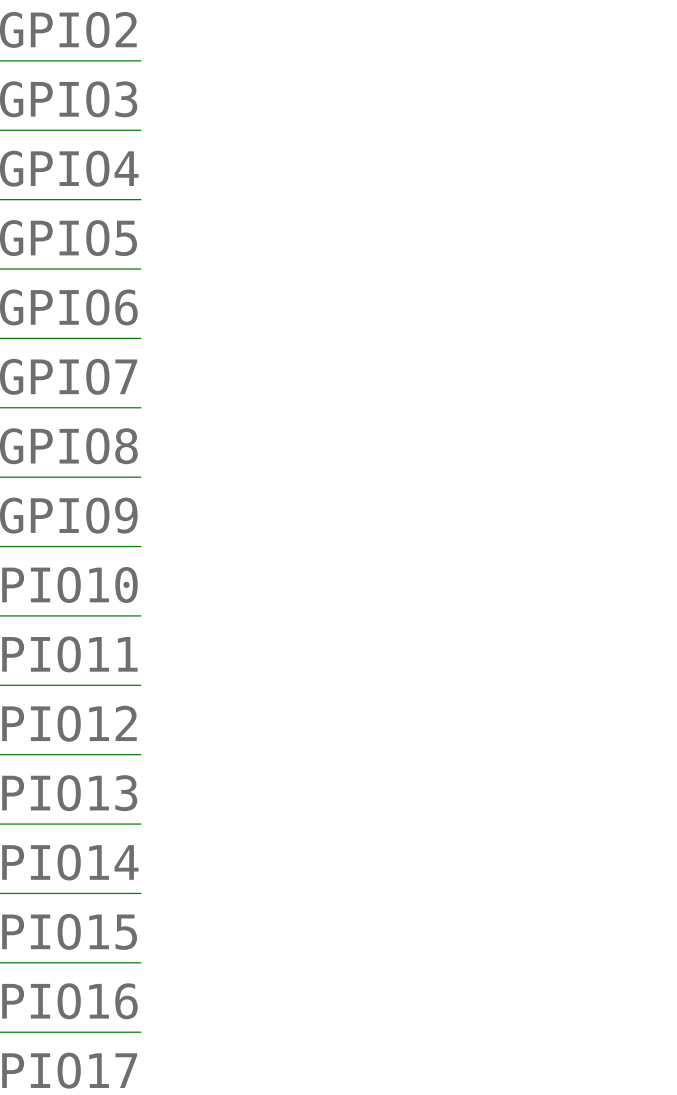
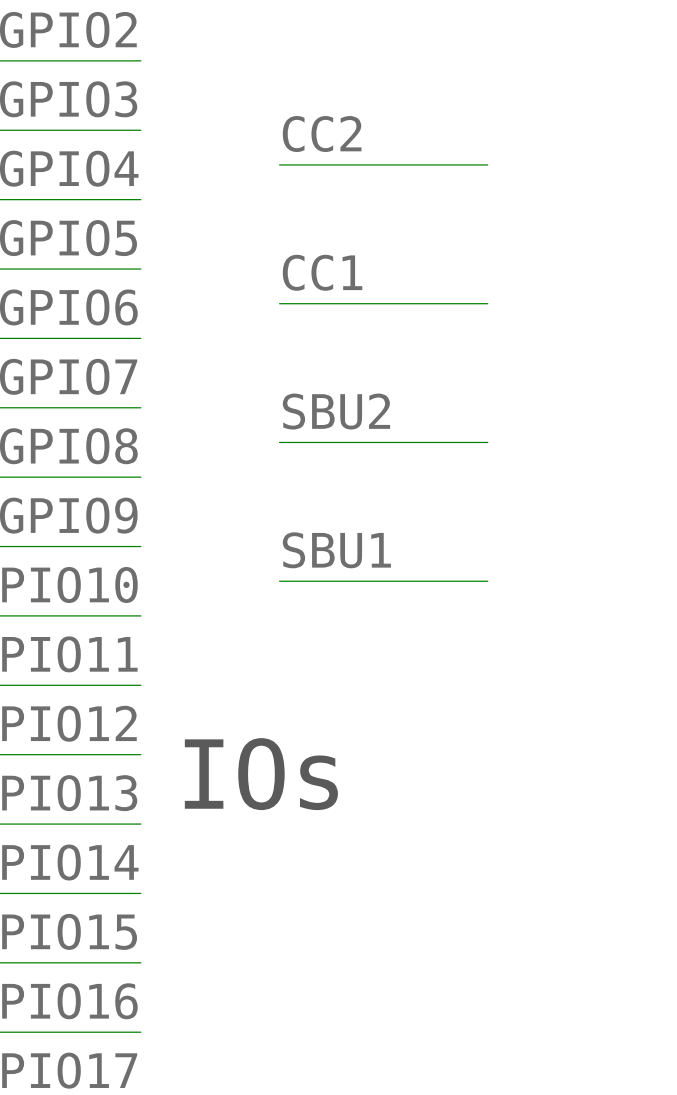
label: none -> CC2 (322, 134)
wire: none -> (279, 164) (487, 164)
label: none -> CC1 (322, 272)
wire: none -> (279, 303) (487, 303)
label: none -> SBU2 (336, 411)
wire: none -> (279, 442) (487, 442)
label: none -> SBU1 (336, 550)
wire: none -> (279, 581) (487, 581)
text: none -> IOs (261, 774)

